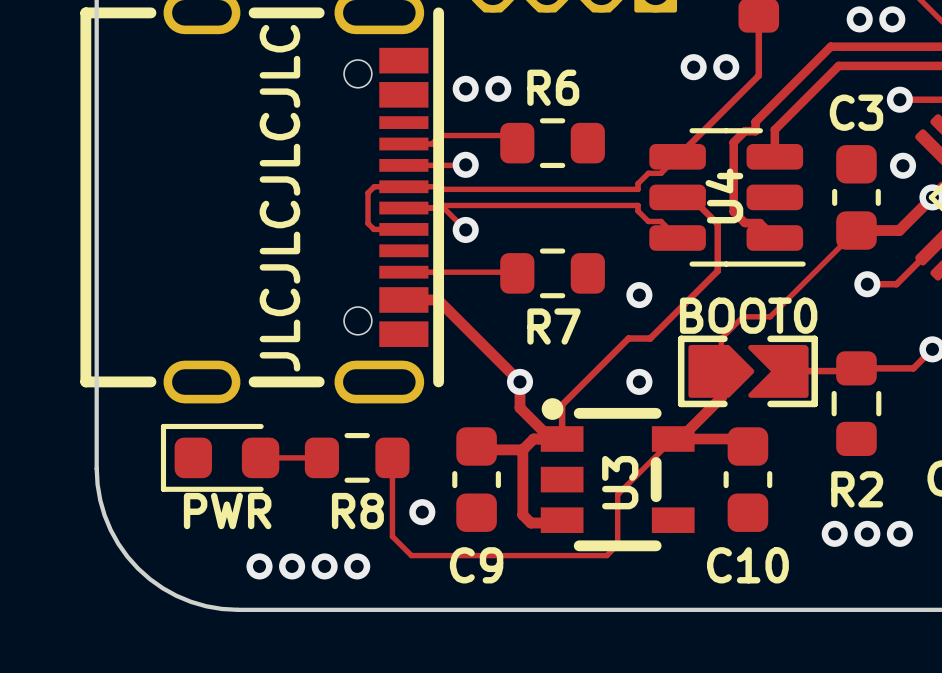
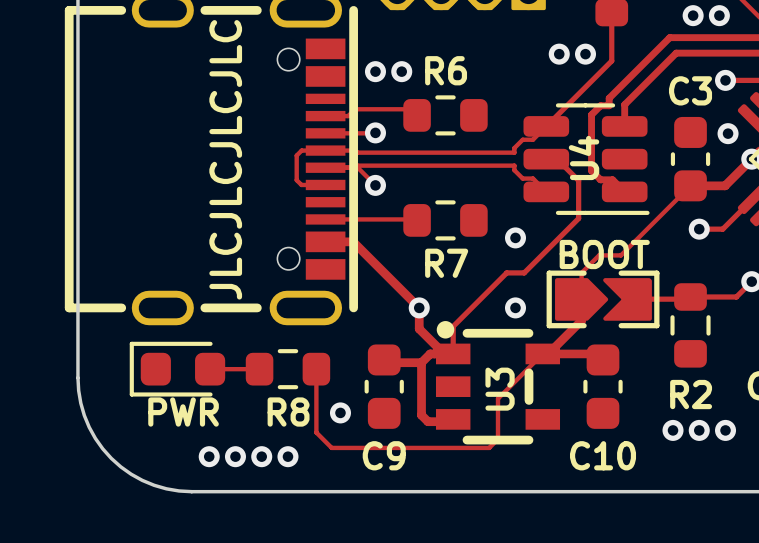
BOOT0 name: BOOT0 (748, 315) -> BOOT (604, 254)

